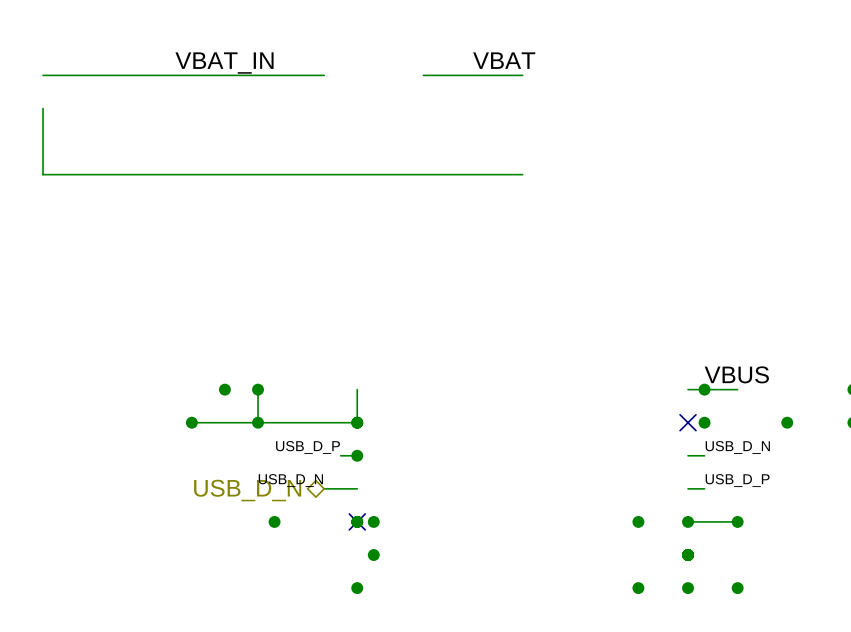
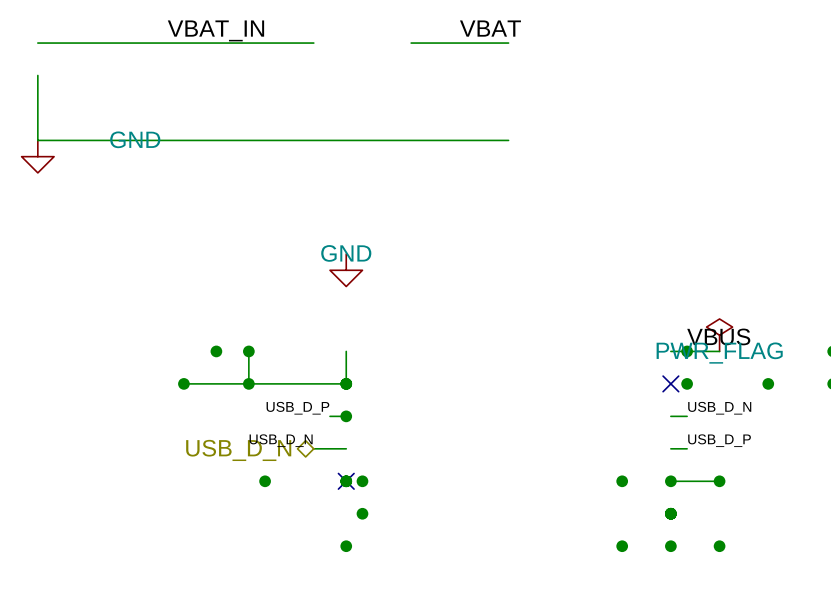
power symbol: none -> GND (37, 156)
power symbol: none -> GND (346, 270)
power symbol: none -> PWR_FLAG (719, 335)

